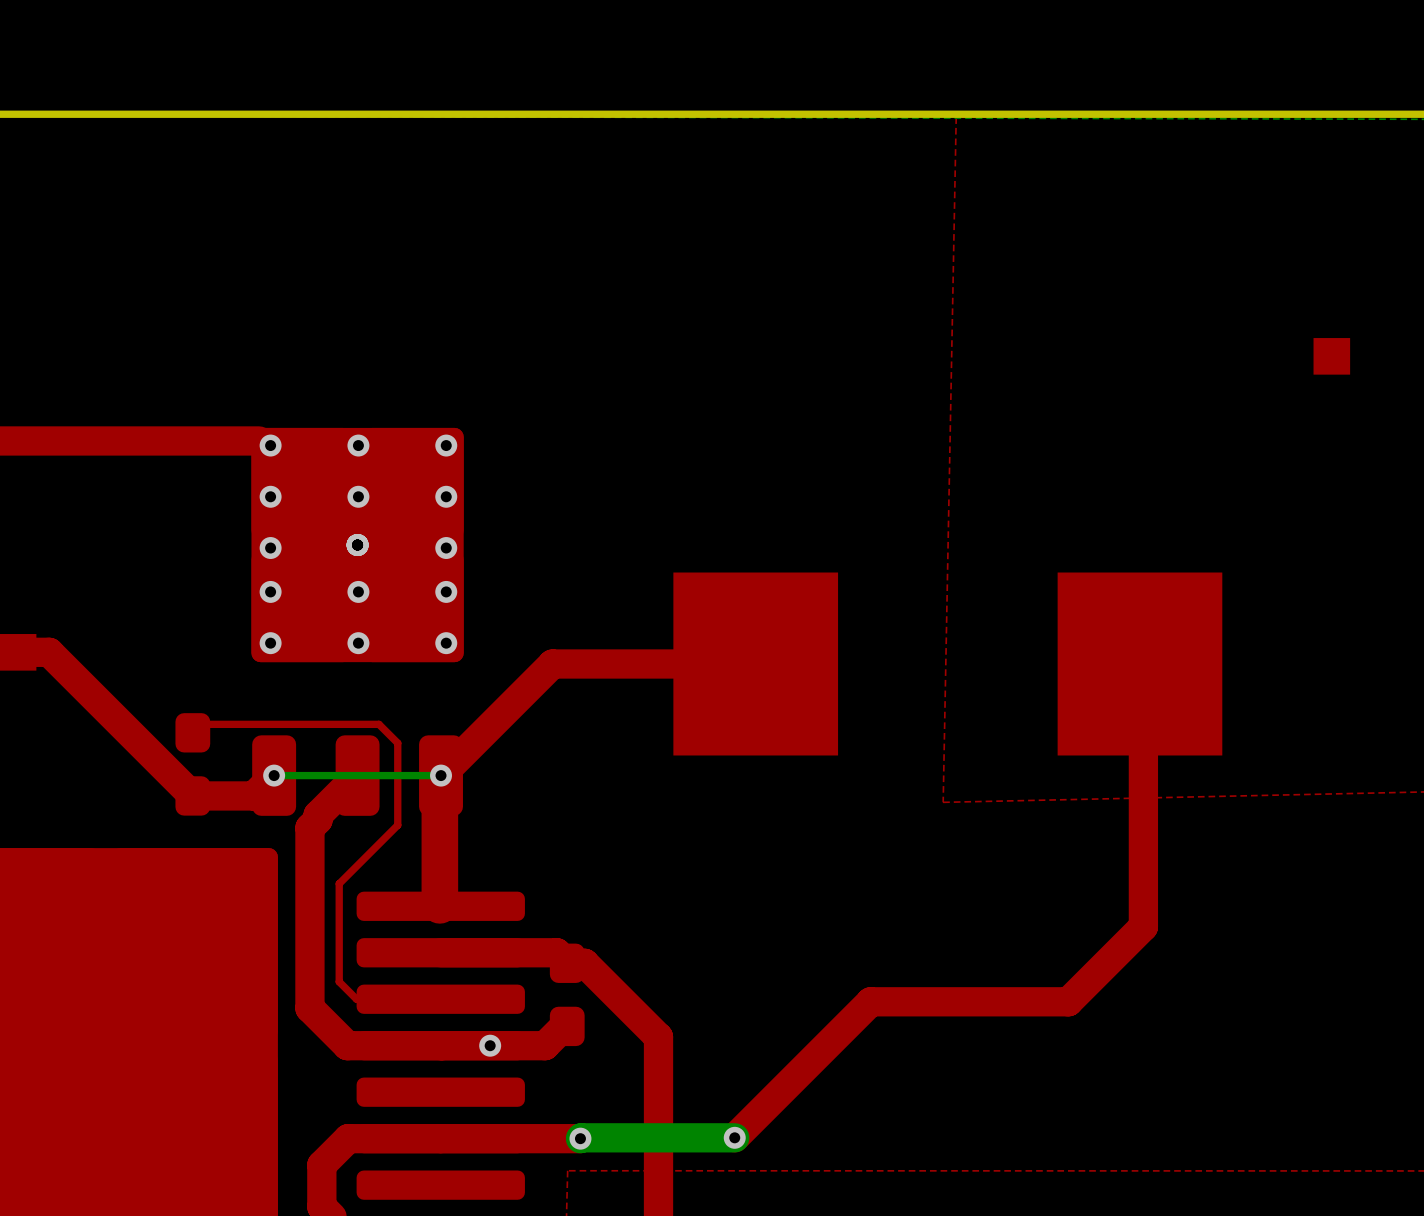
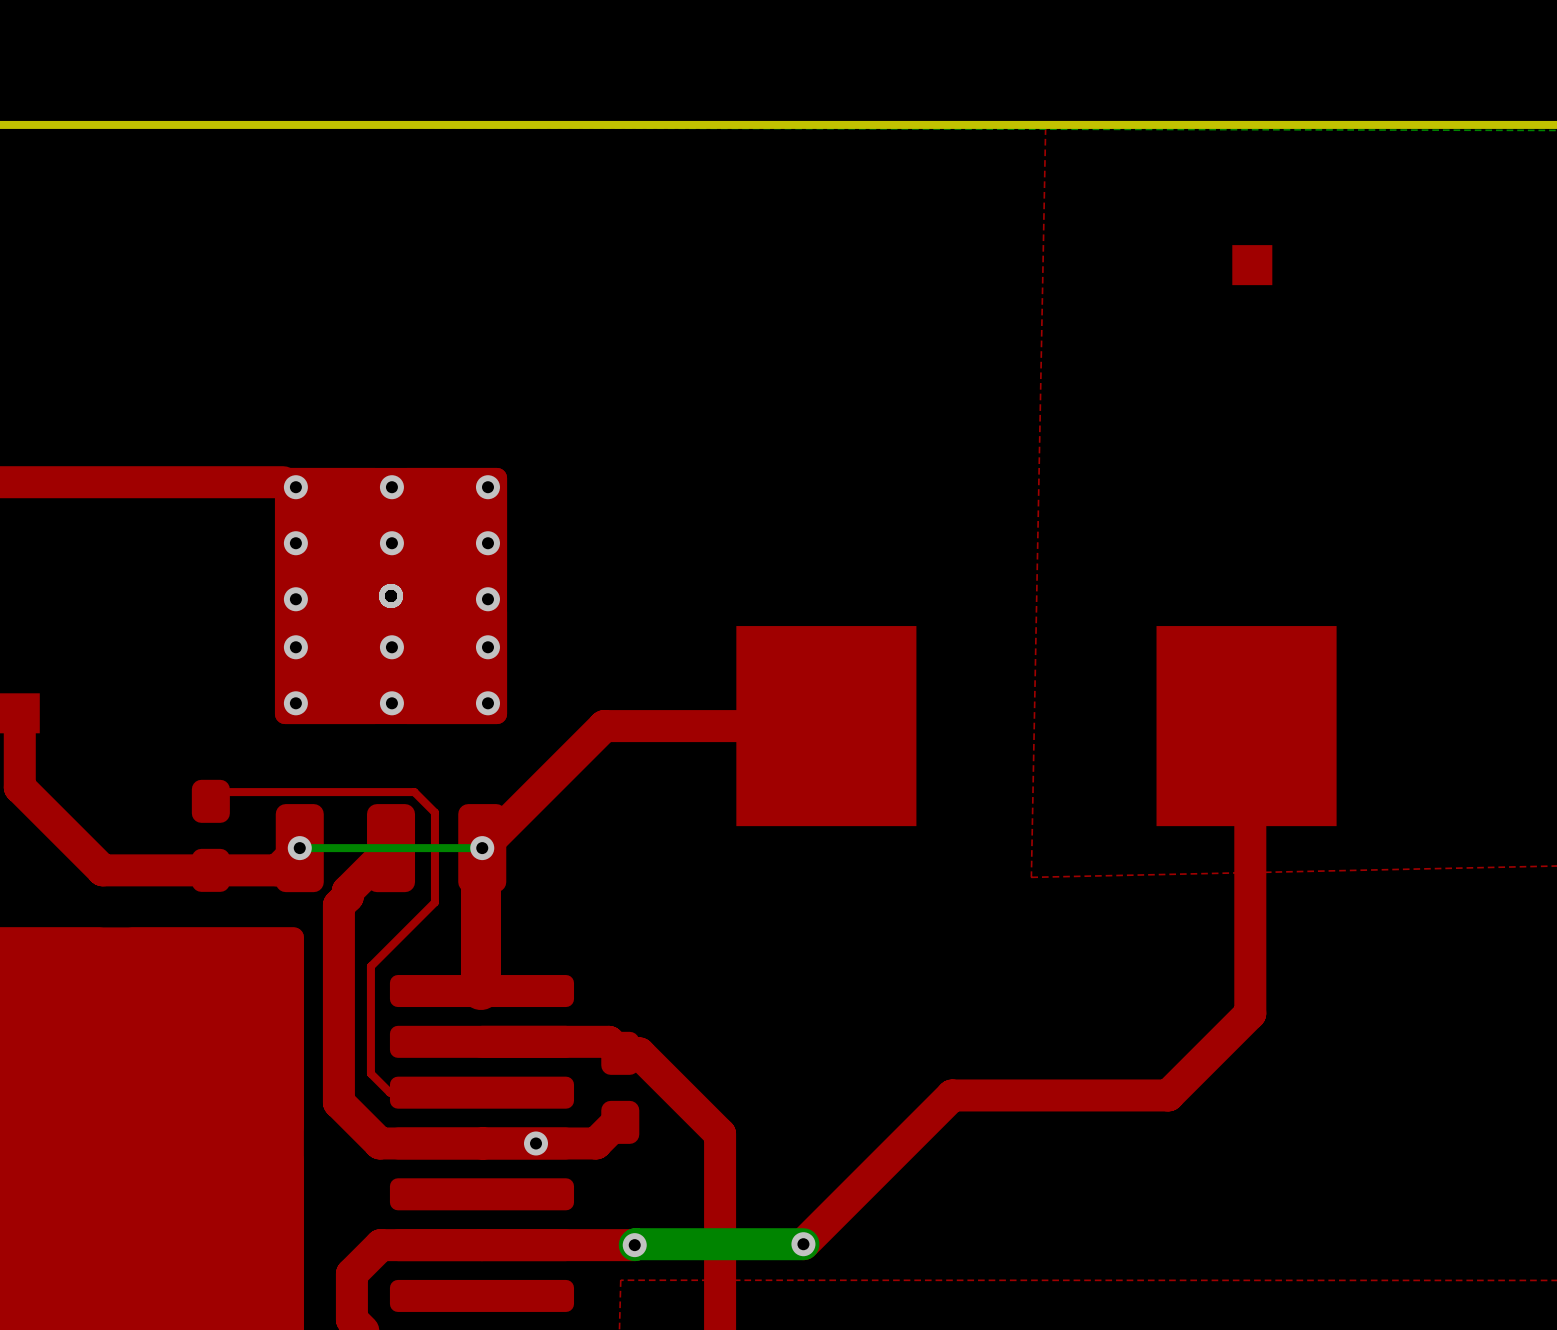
part position: (1331, 356) -> (1252, 265)
top track: (18, 652) (49, 652) (192, 795) -> (19, 713) (19, 787) (102, 870) (210, 870)

